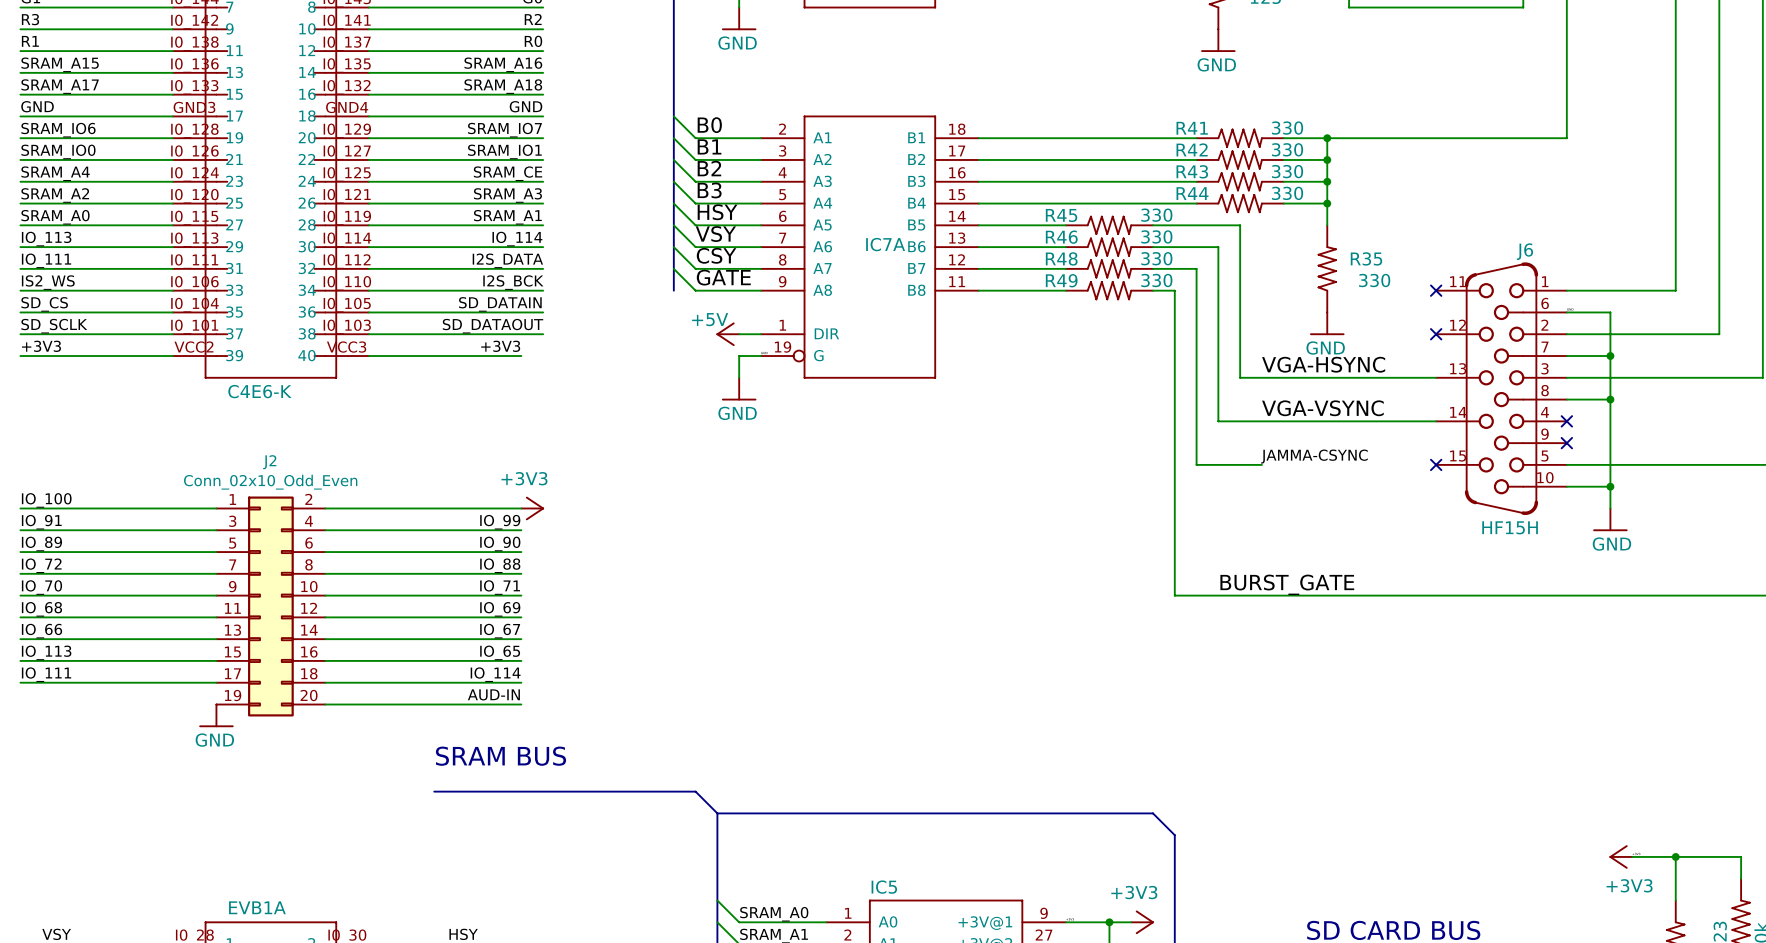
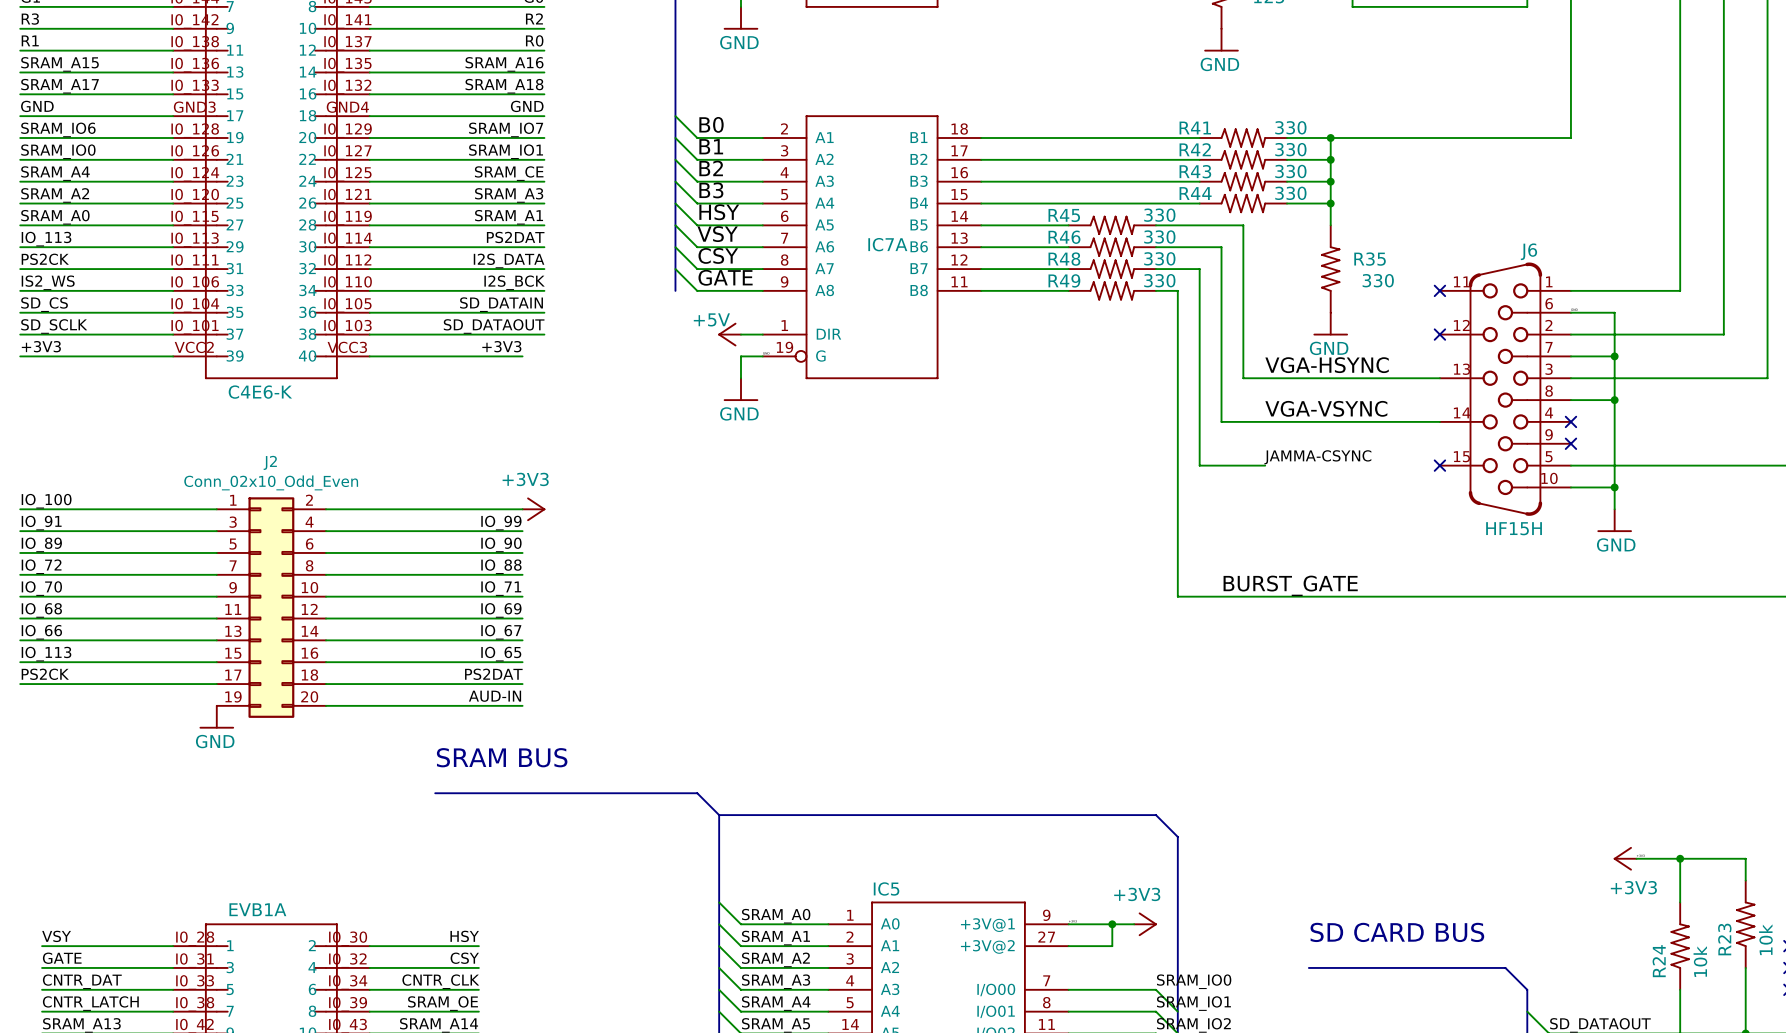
label: IO_114 (517, 239) -> PS2DAT (515, 237)
label: IO_111 (46, 260) -> PS2CK (45, 259)
label: IO_111 (46, 674) -> PS2CK (45, 674)
label: IO_114 (495, 674) -> PS2DAT (493, 674)

